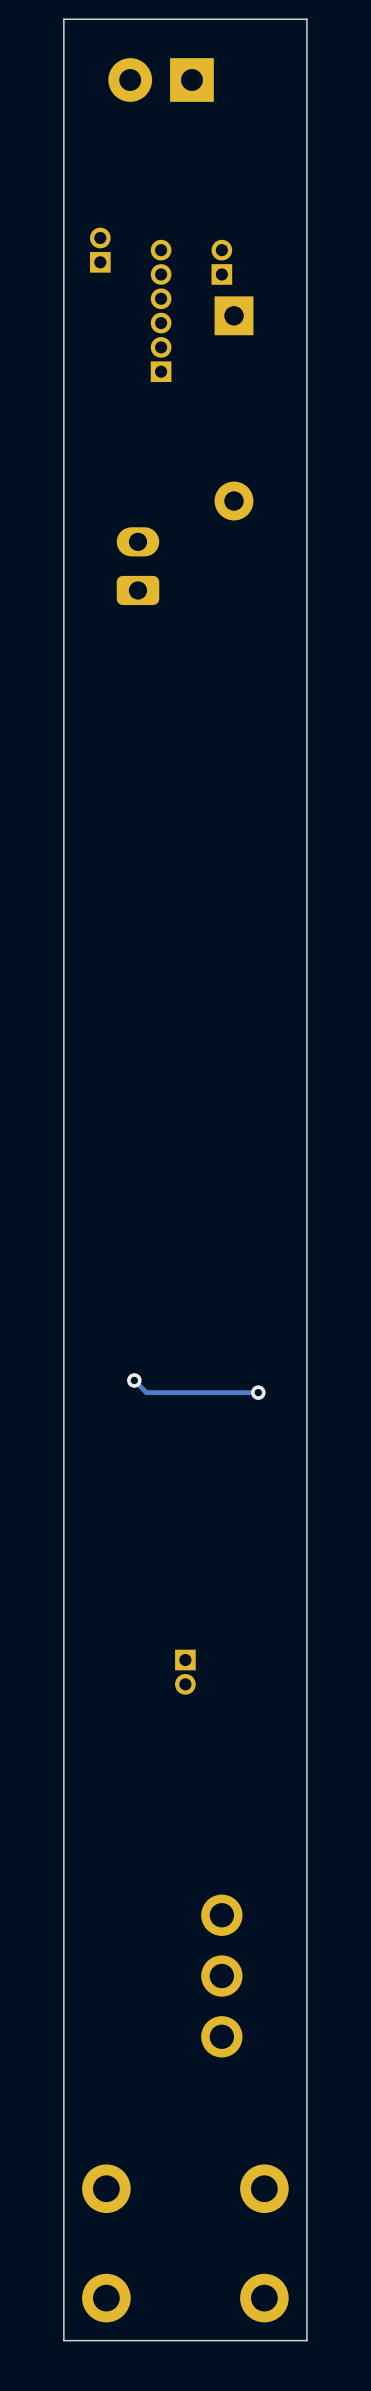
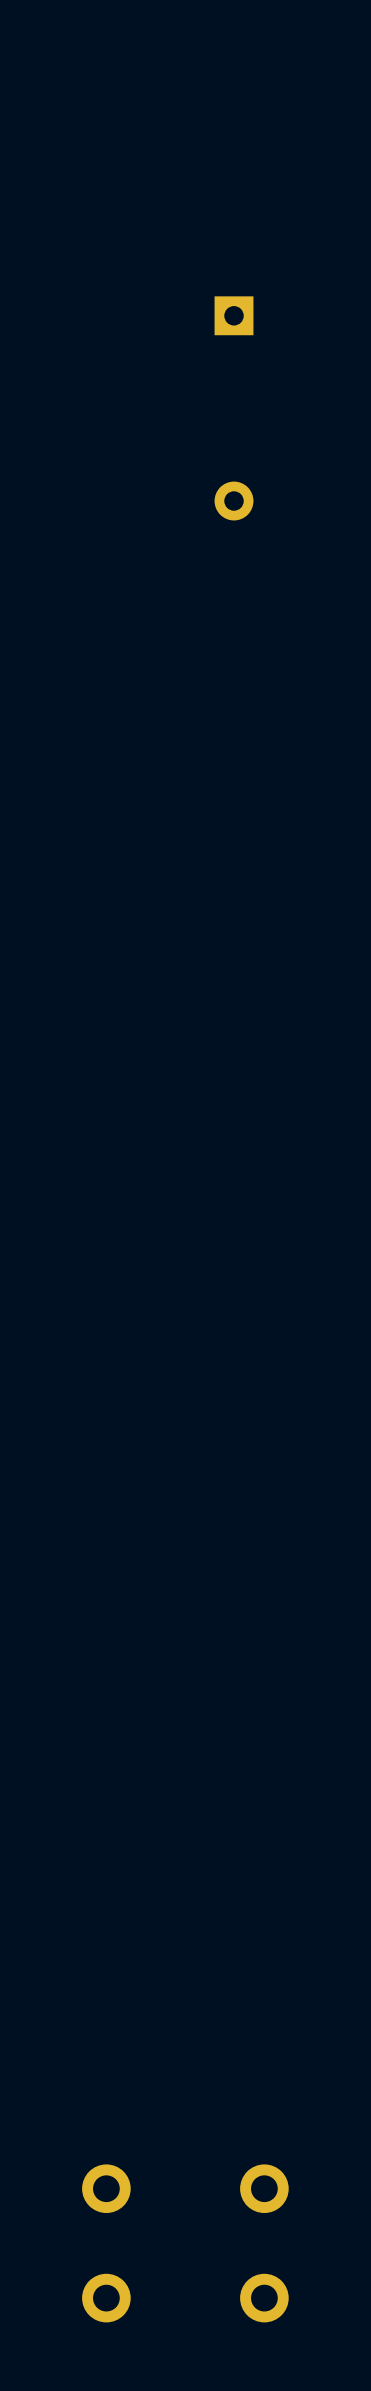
board edge: (306, 19) (63, 19) (63, 2340) (306, 2340) (306, 19) -> none
part: (161, 80) -> none
part: (100, 250) -> none
part: (221, 262) -> none
part: (161, 310) -> none
part: (137, 566) -> none
track: (134, 1380) (146, 1392) (258, 1392) -> none
via: (134, 1380) -> none
via: (258, 1392) -> none
part: (185, 1672) -> none
part: (221, 1976) -> none

